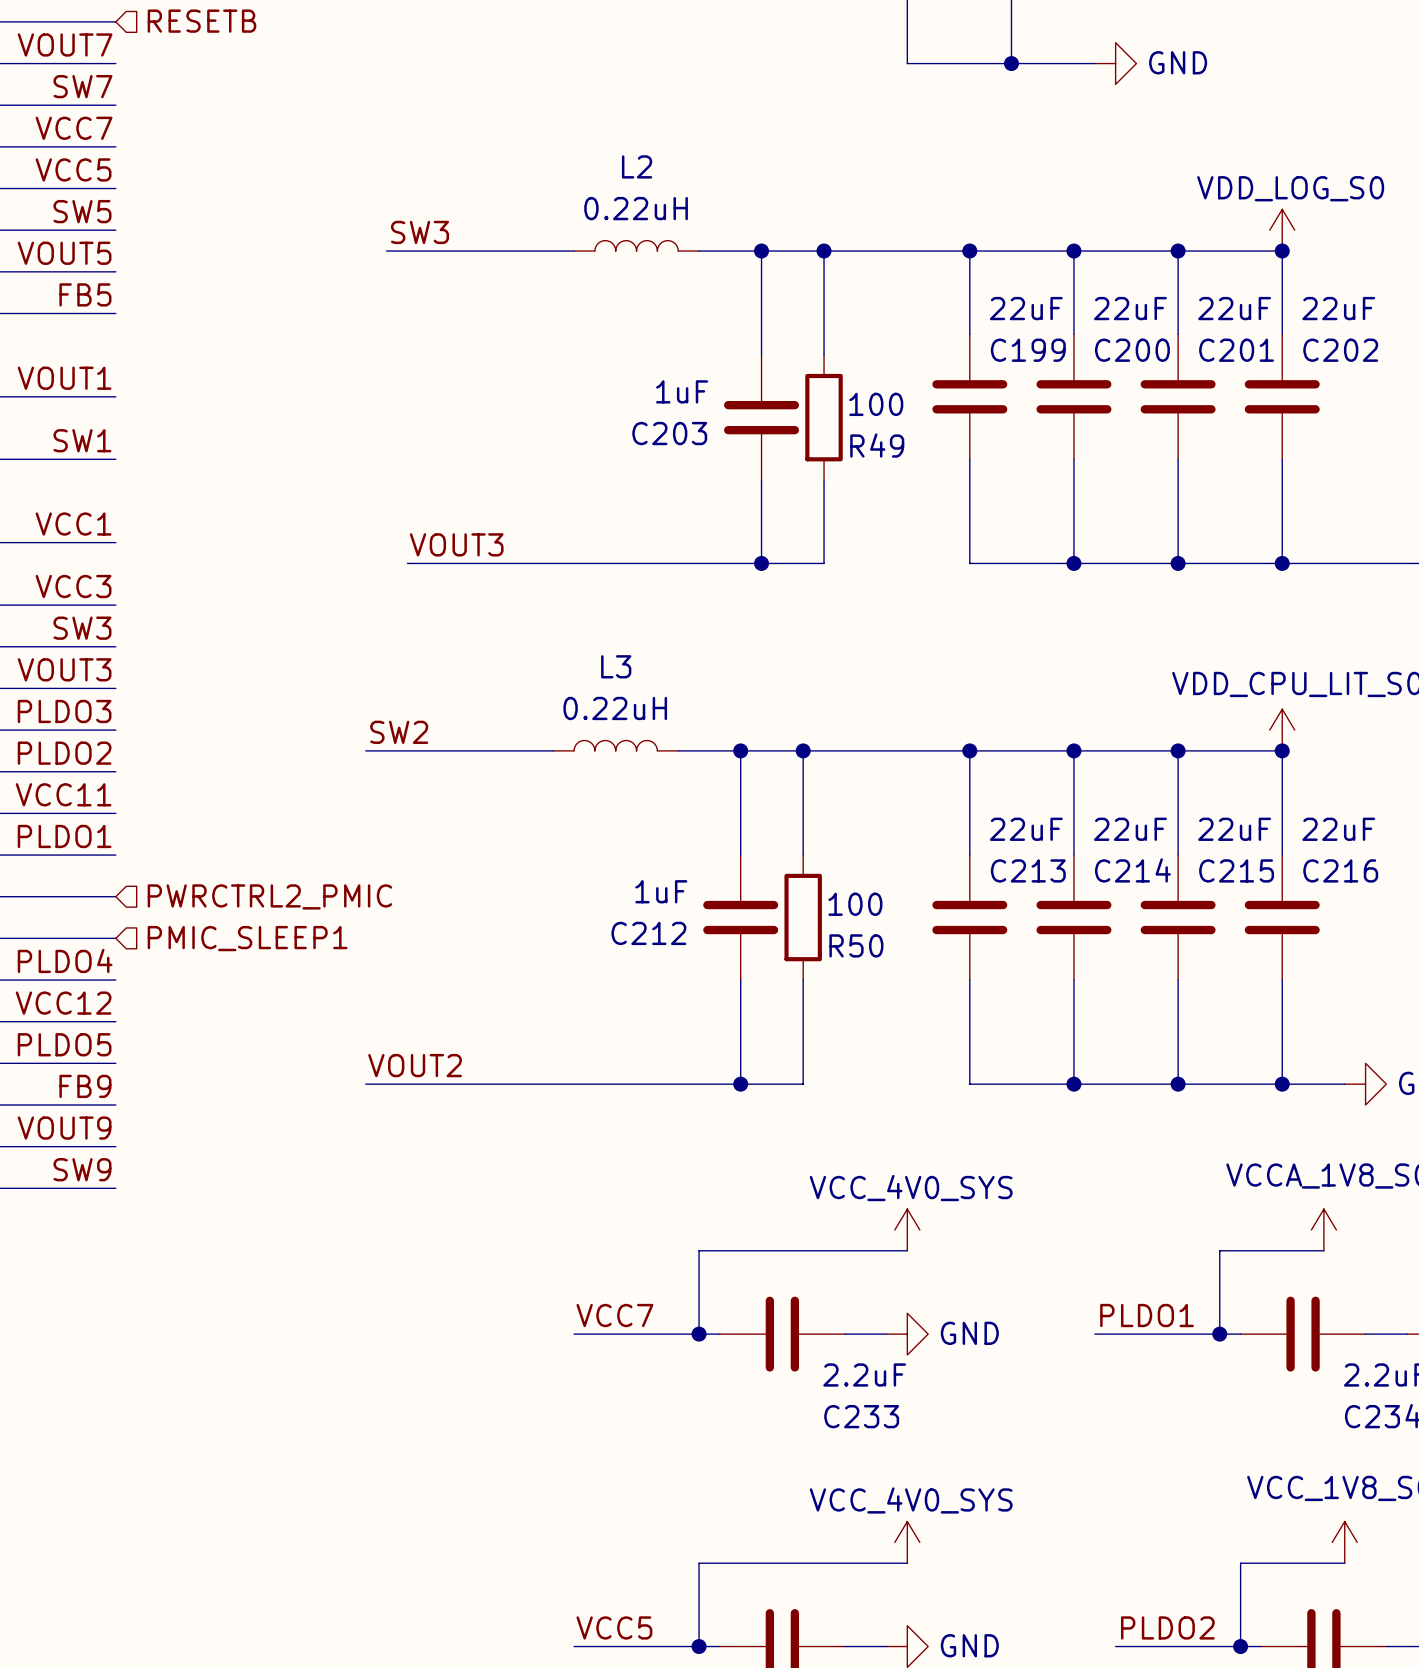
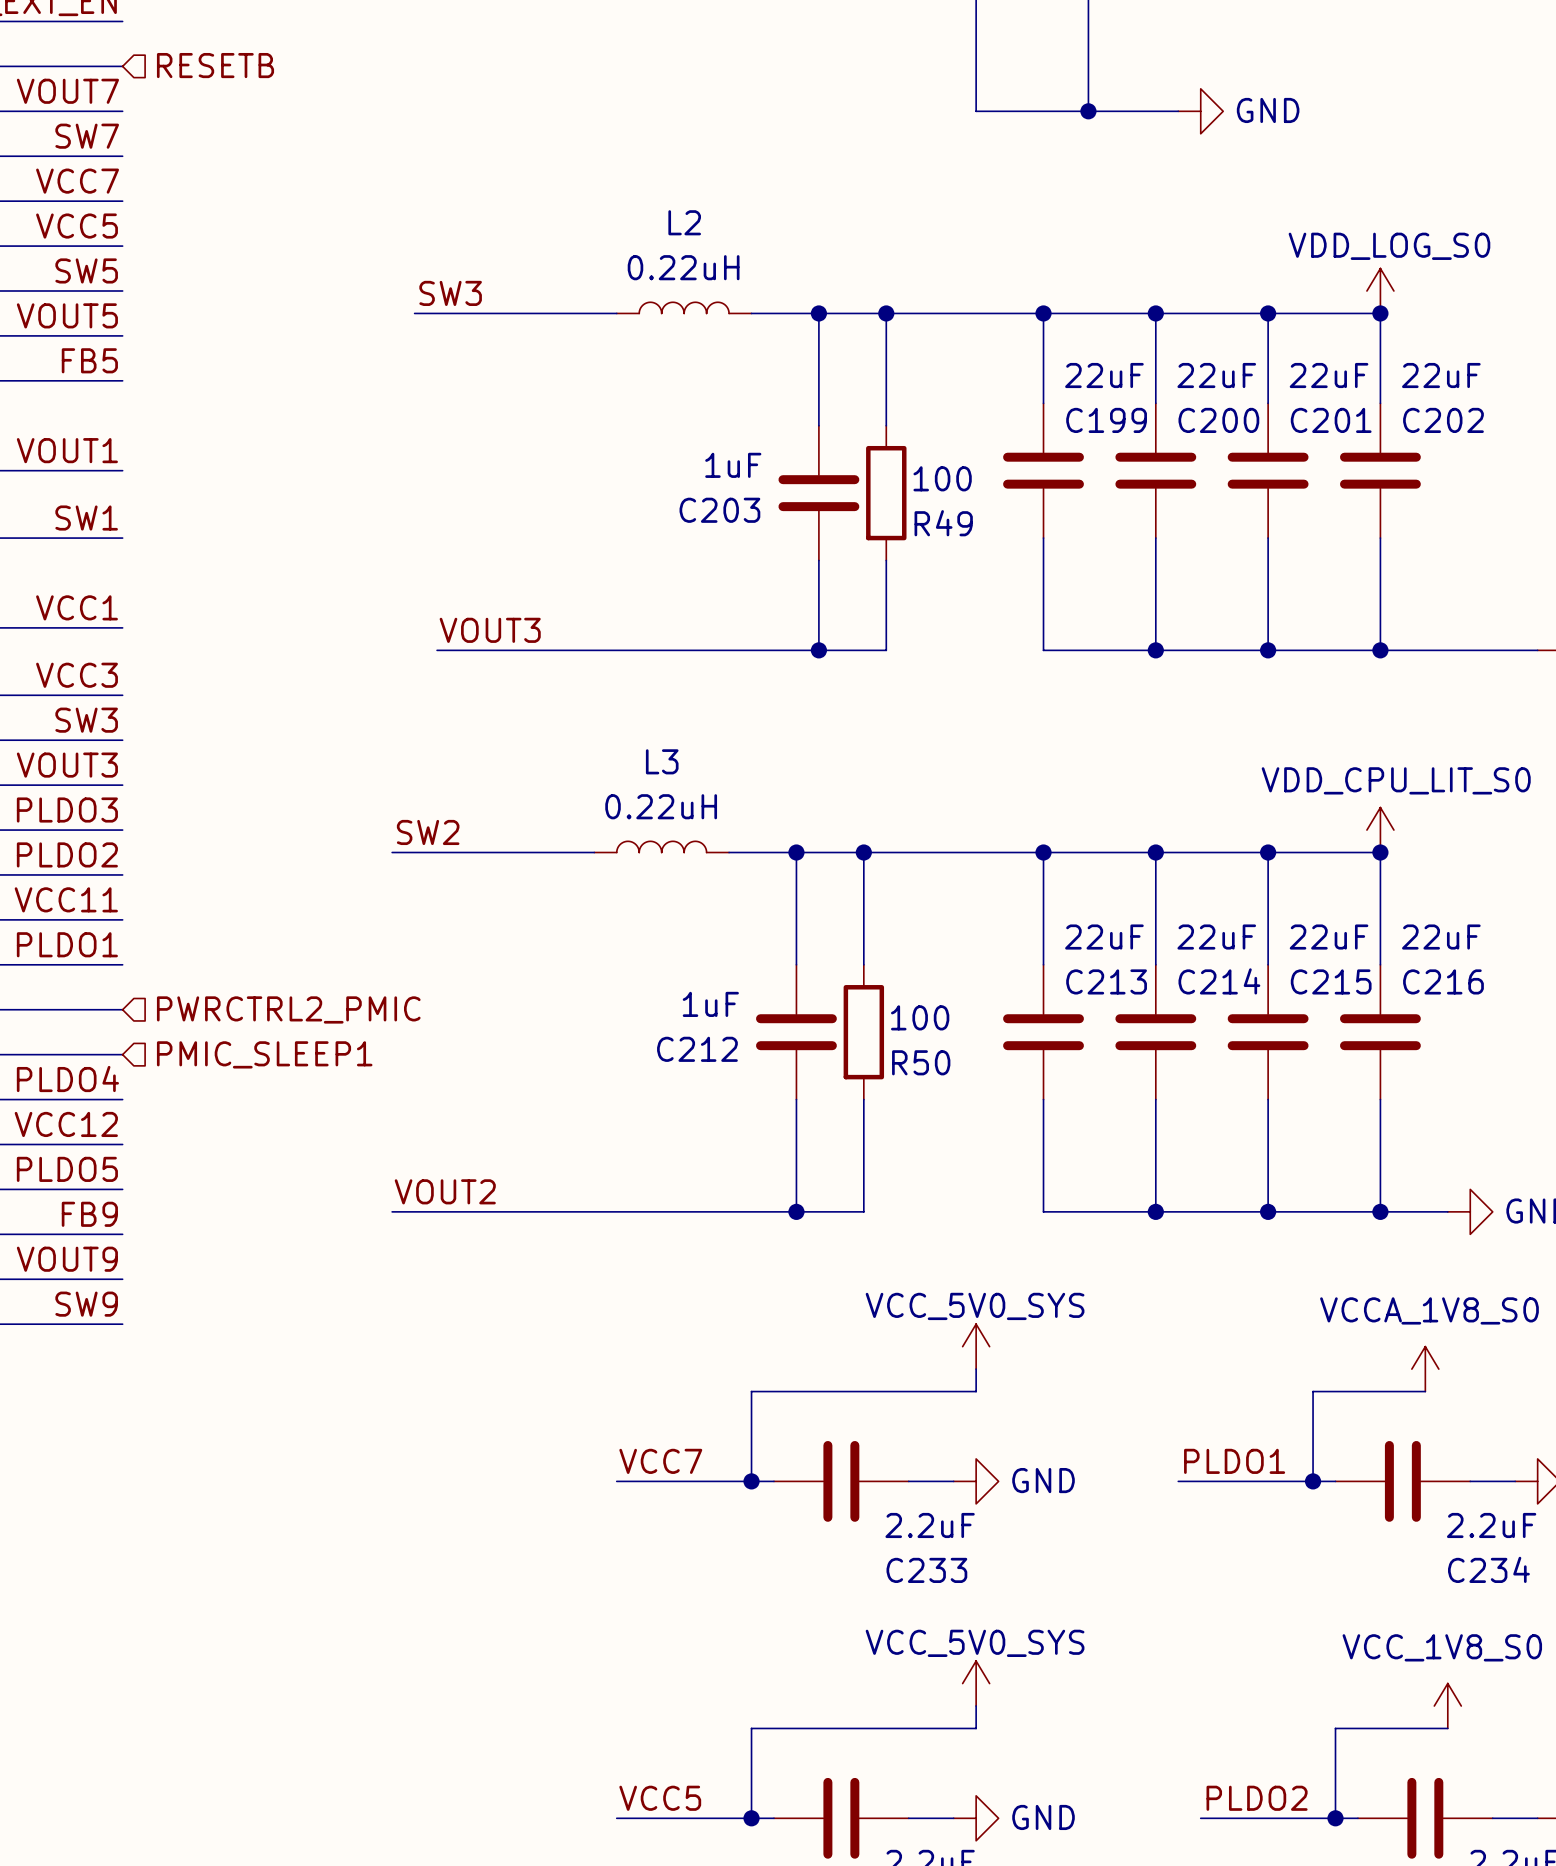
power symbol: none -> VCC_5V0_SYS (976, 1346)
power symbol: VCC_4V0_SYS (907, 1229) -> none
power symbol: none -> VCC_5V0_SYS (976, 1683)
power symbol: VCC_4V0_SYS (907, 1542) -> none

